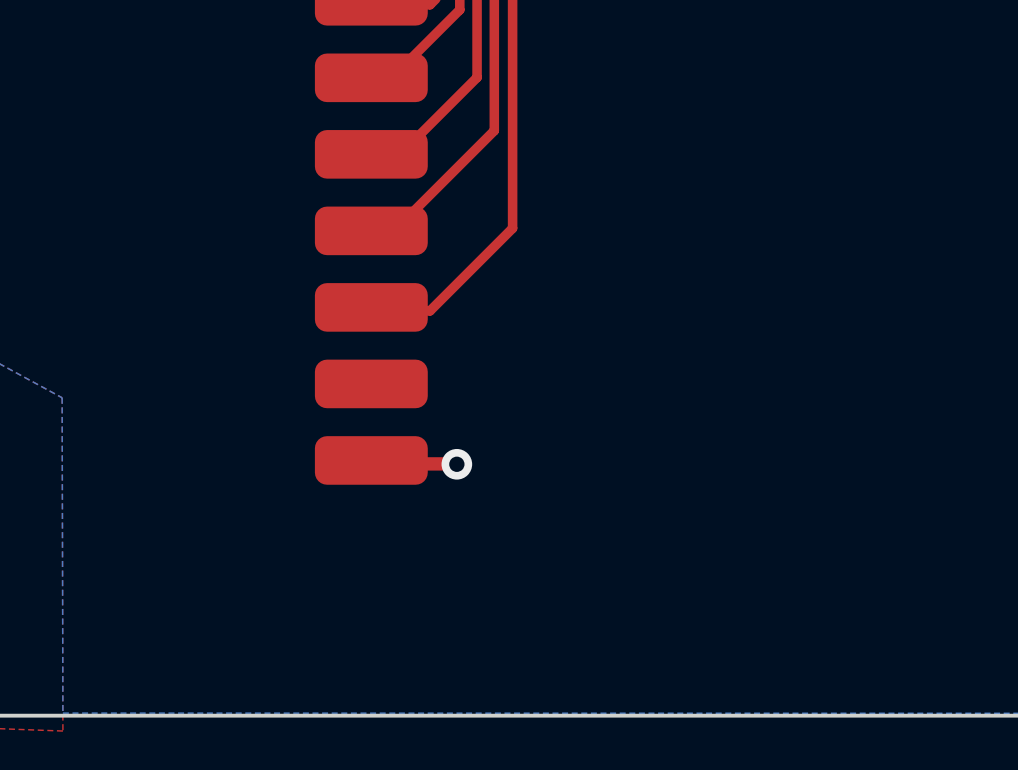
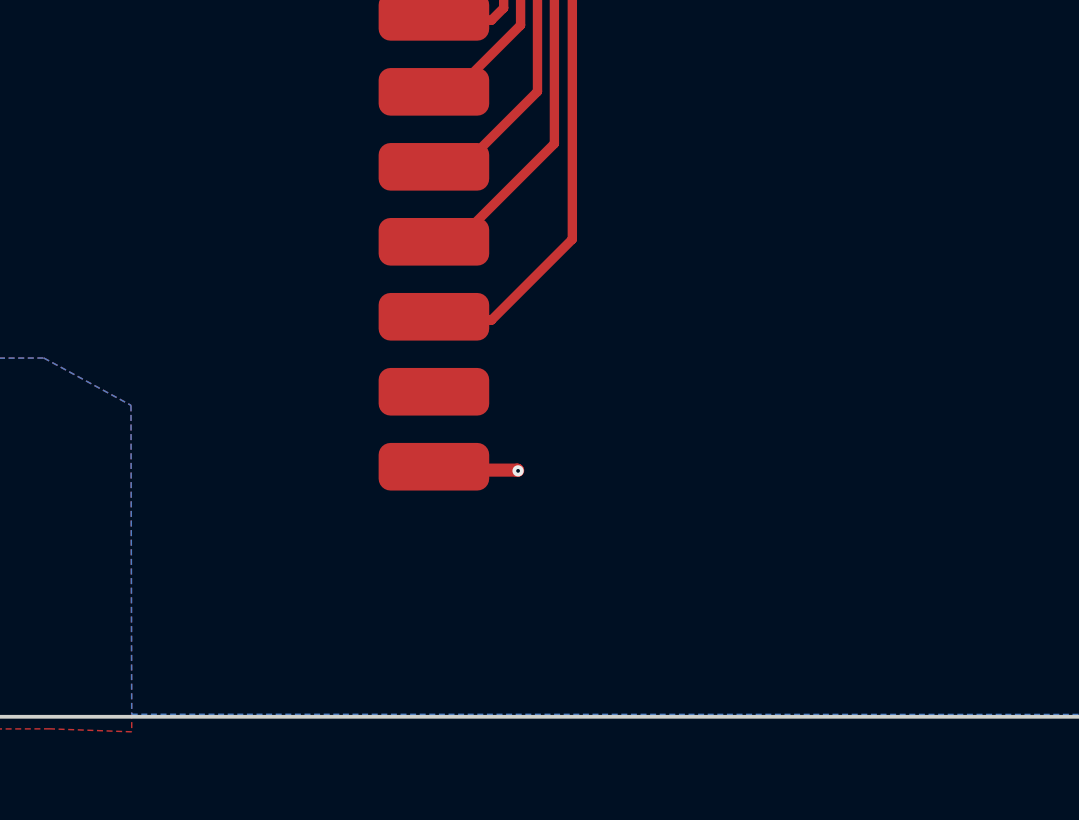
via size: [441, 448, 473, 480] -> [512, 465, 524, 477]

